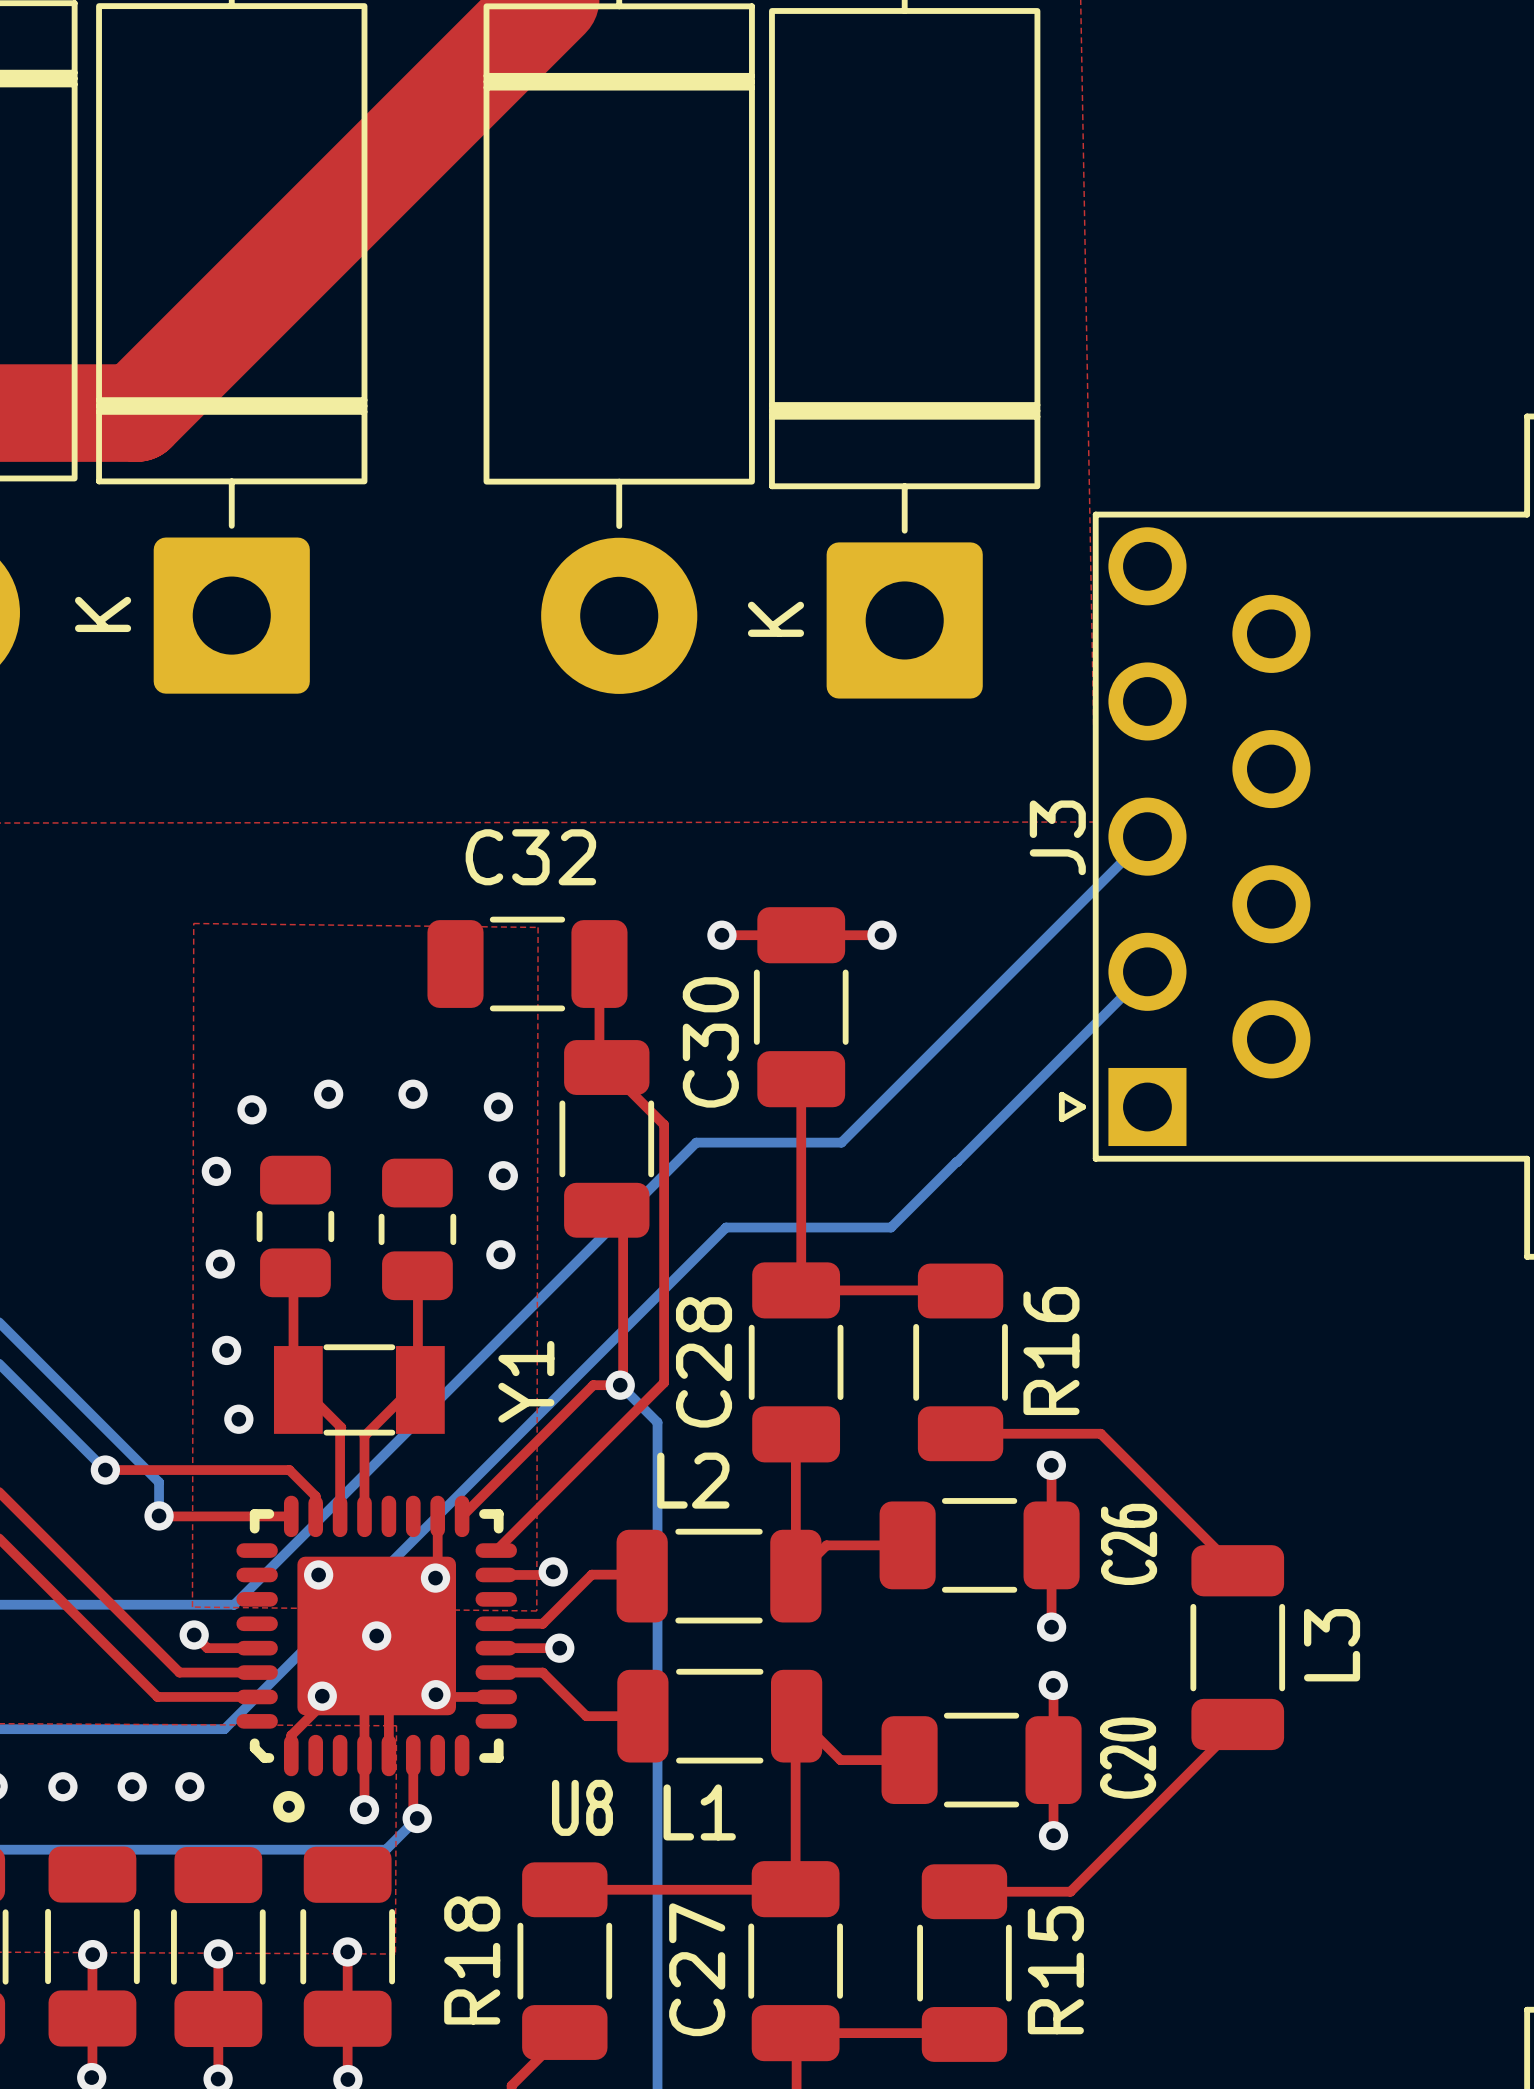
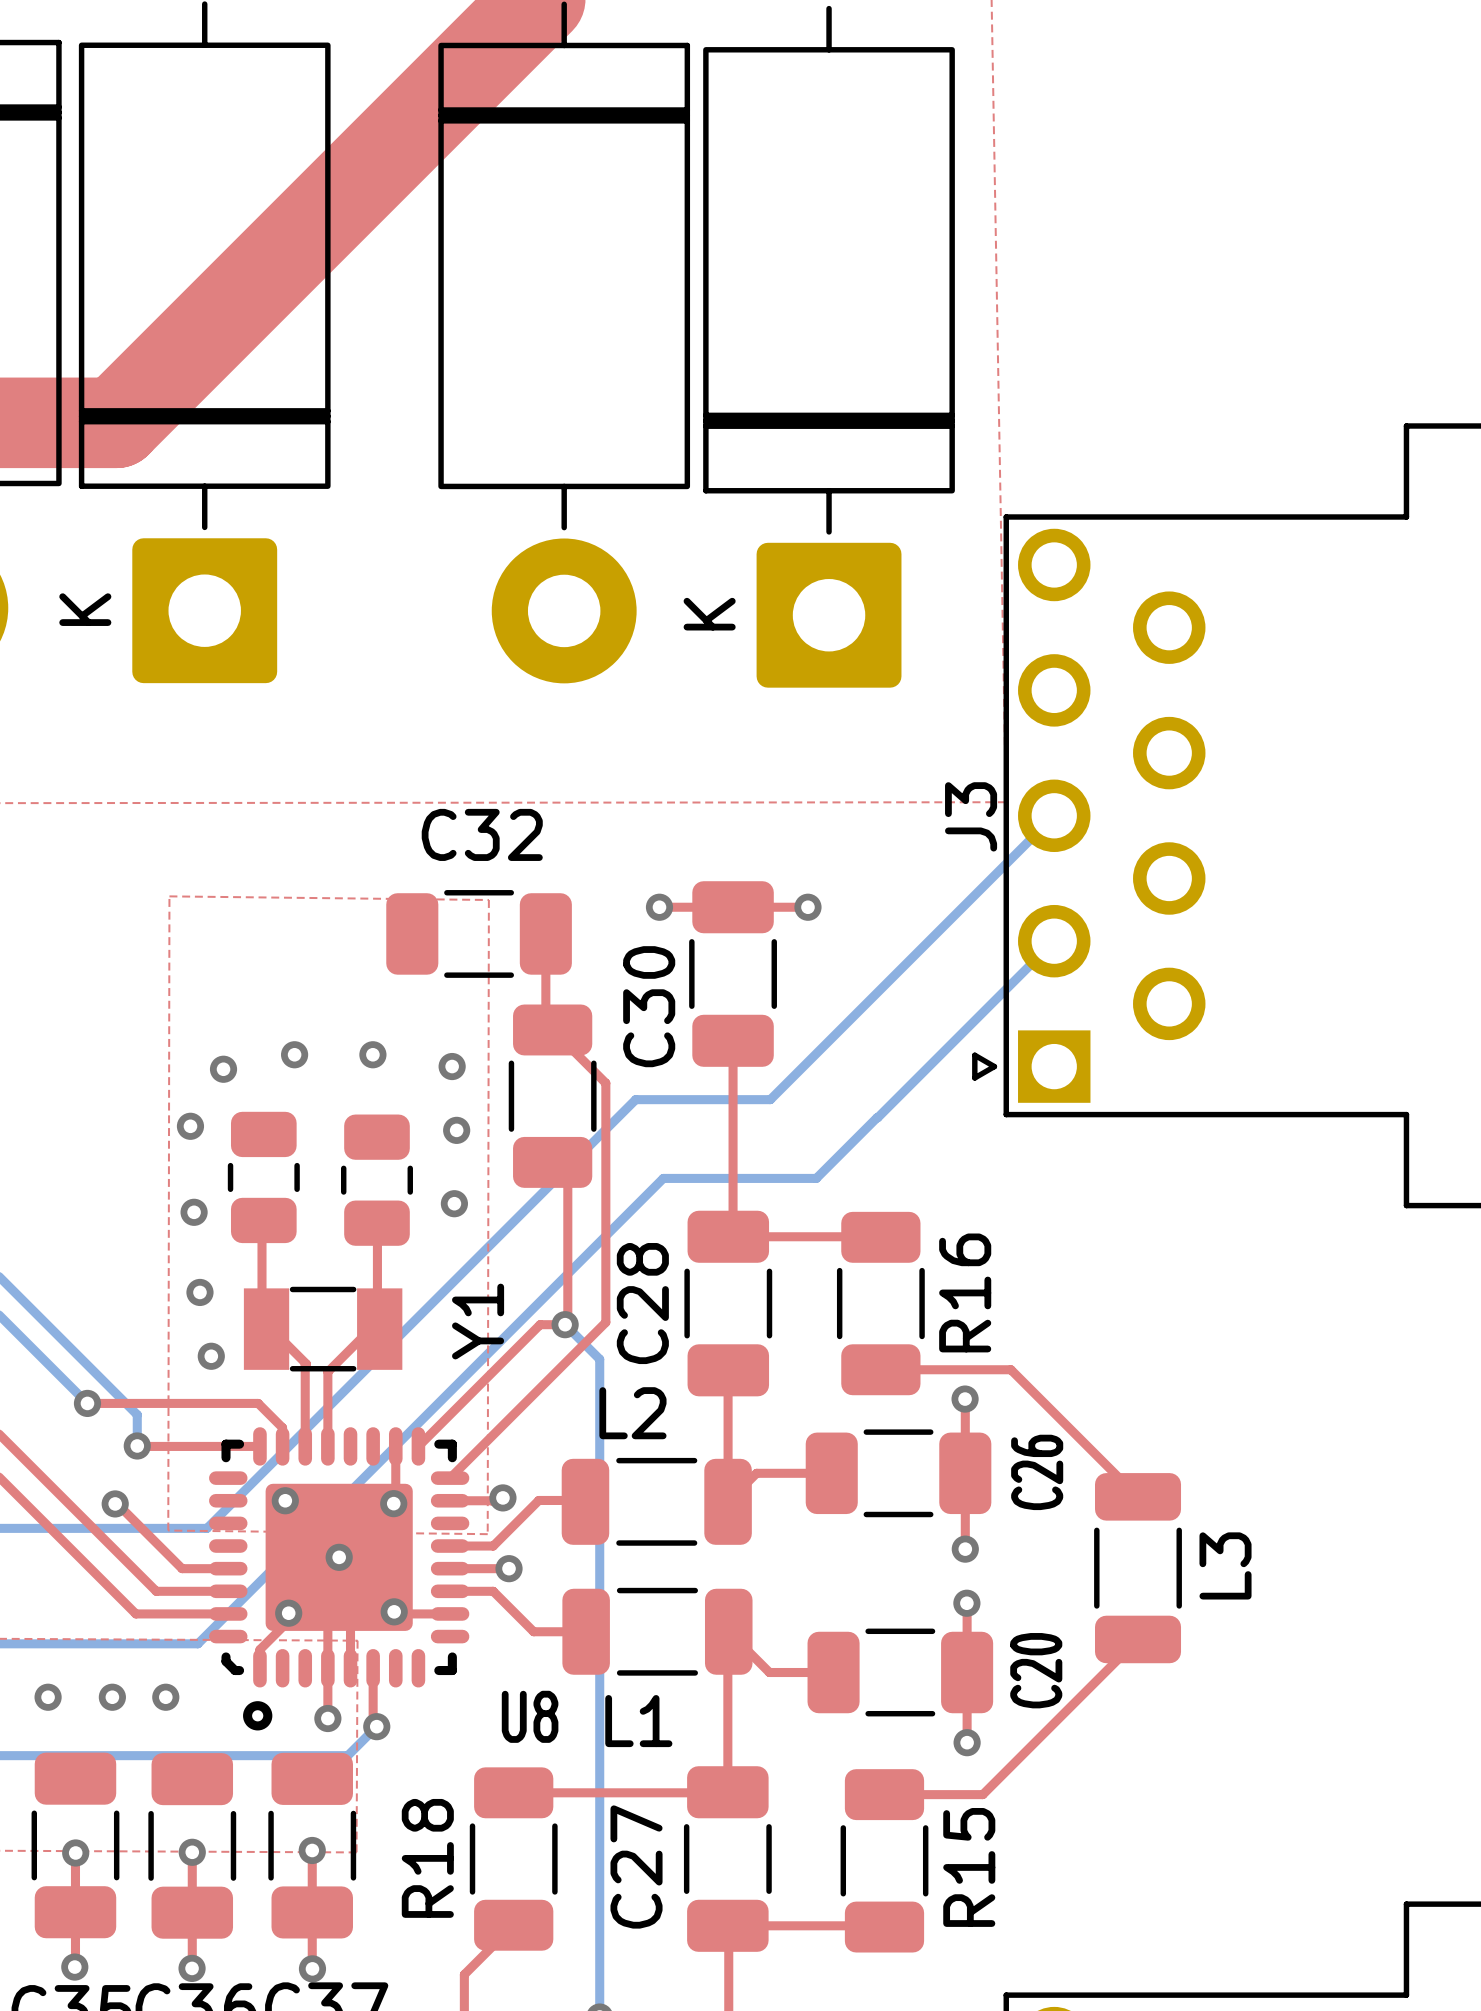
top track: none -> (115, 1503) (169, 1556)
via position: (194, 1634) -> (115, 1503)

